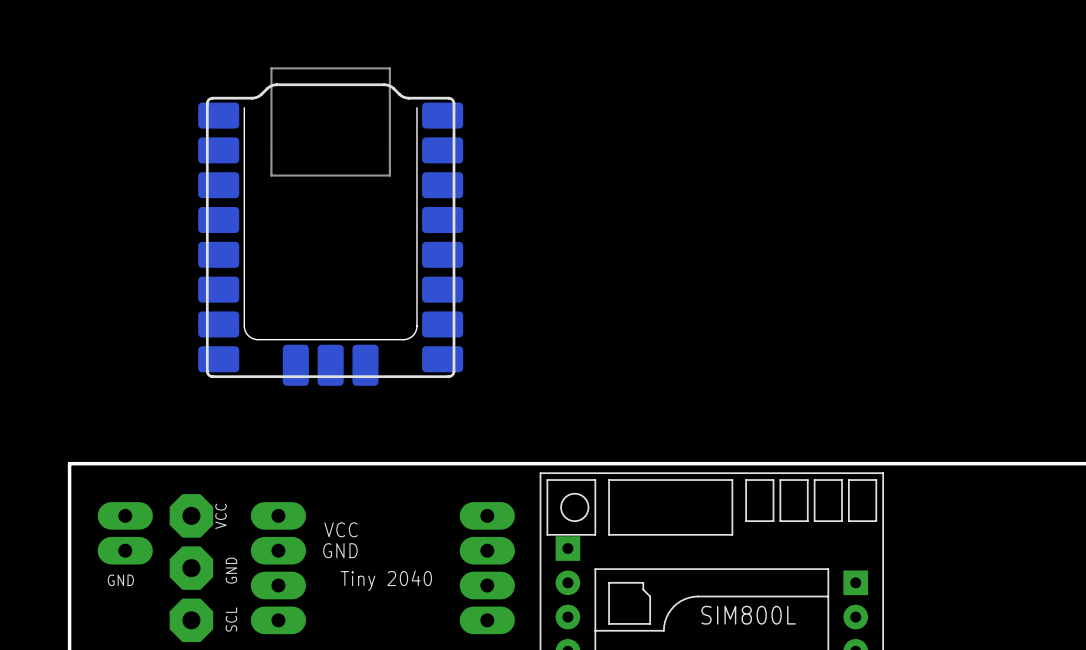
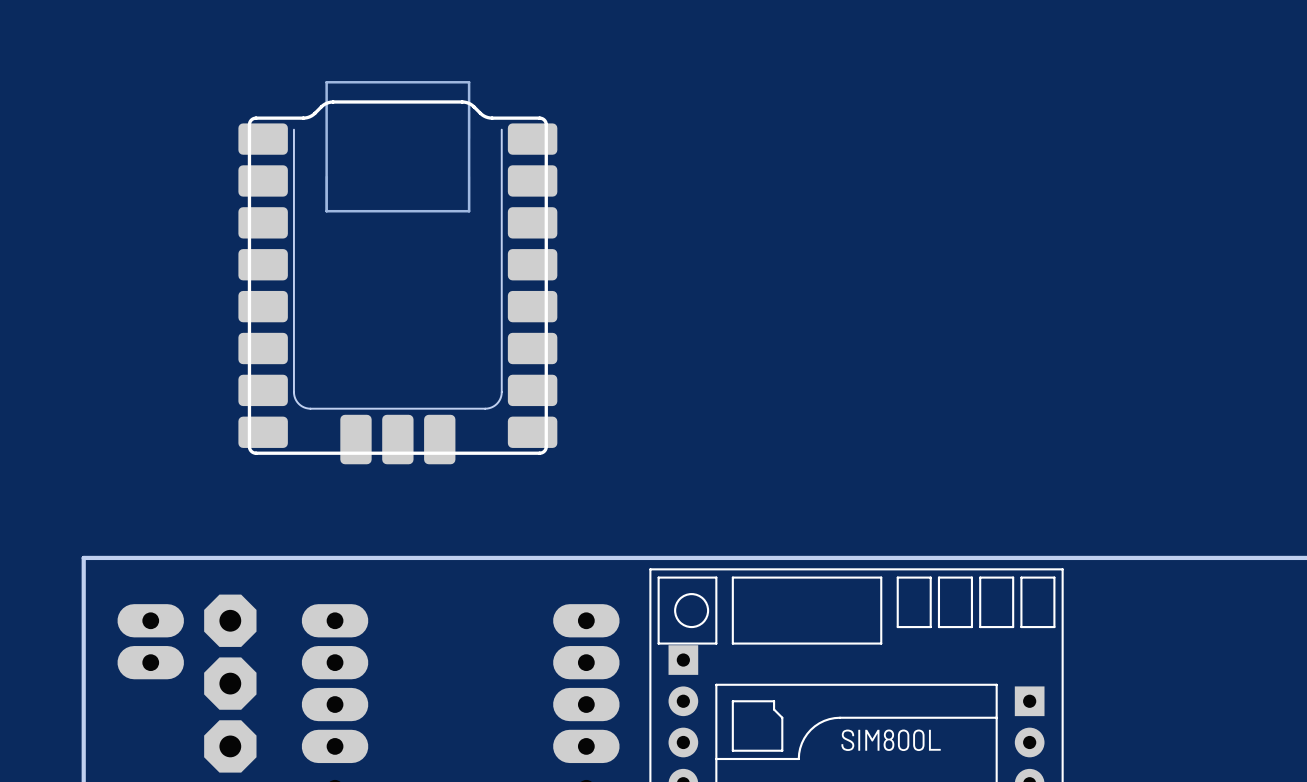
text: VCC (221, 516) -> none
text: VCC (341, 529) -> none
text: GND (340, 550) -> none
text: GND (231, 570) -> none
text: GND (120, 580) -> none
text: Tiny 2040 (386, 580) -> none
text: SCL (231, 619) -> none

